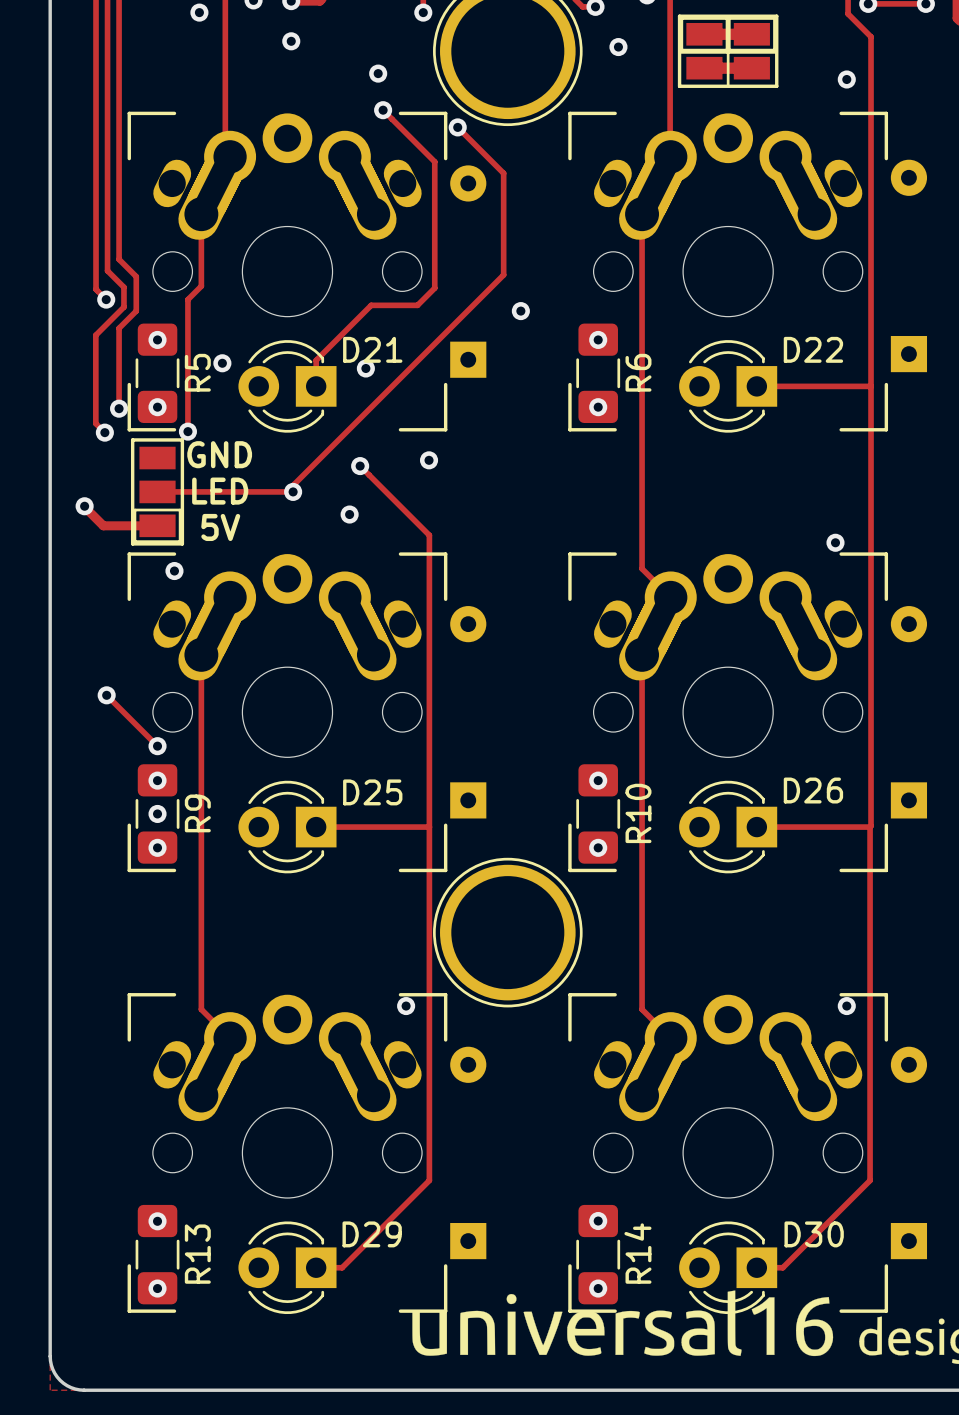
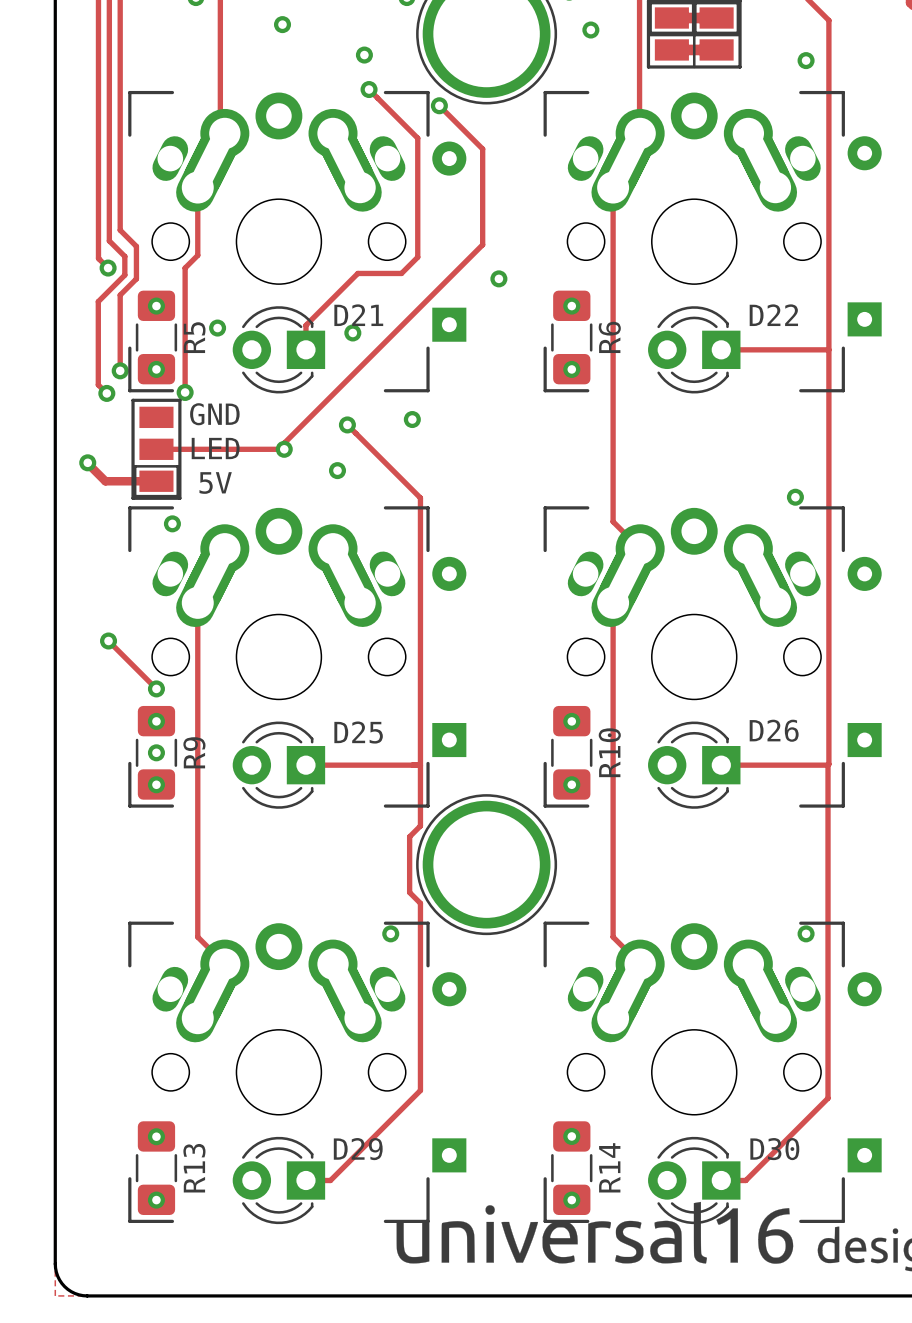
track: (429, 535) (429, 1180) -> (419, 765) (420, 825) (409, 836) (409, 892) (420, 903) (420, 1090) (412, 1098)
track: none -> (412, 490) (420, 497) (420, 765) (412, 765)

